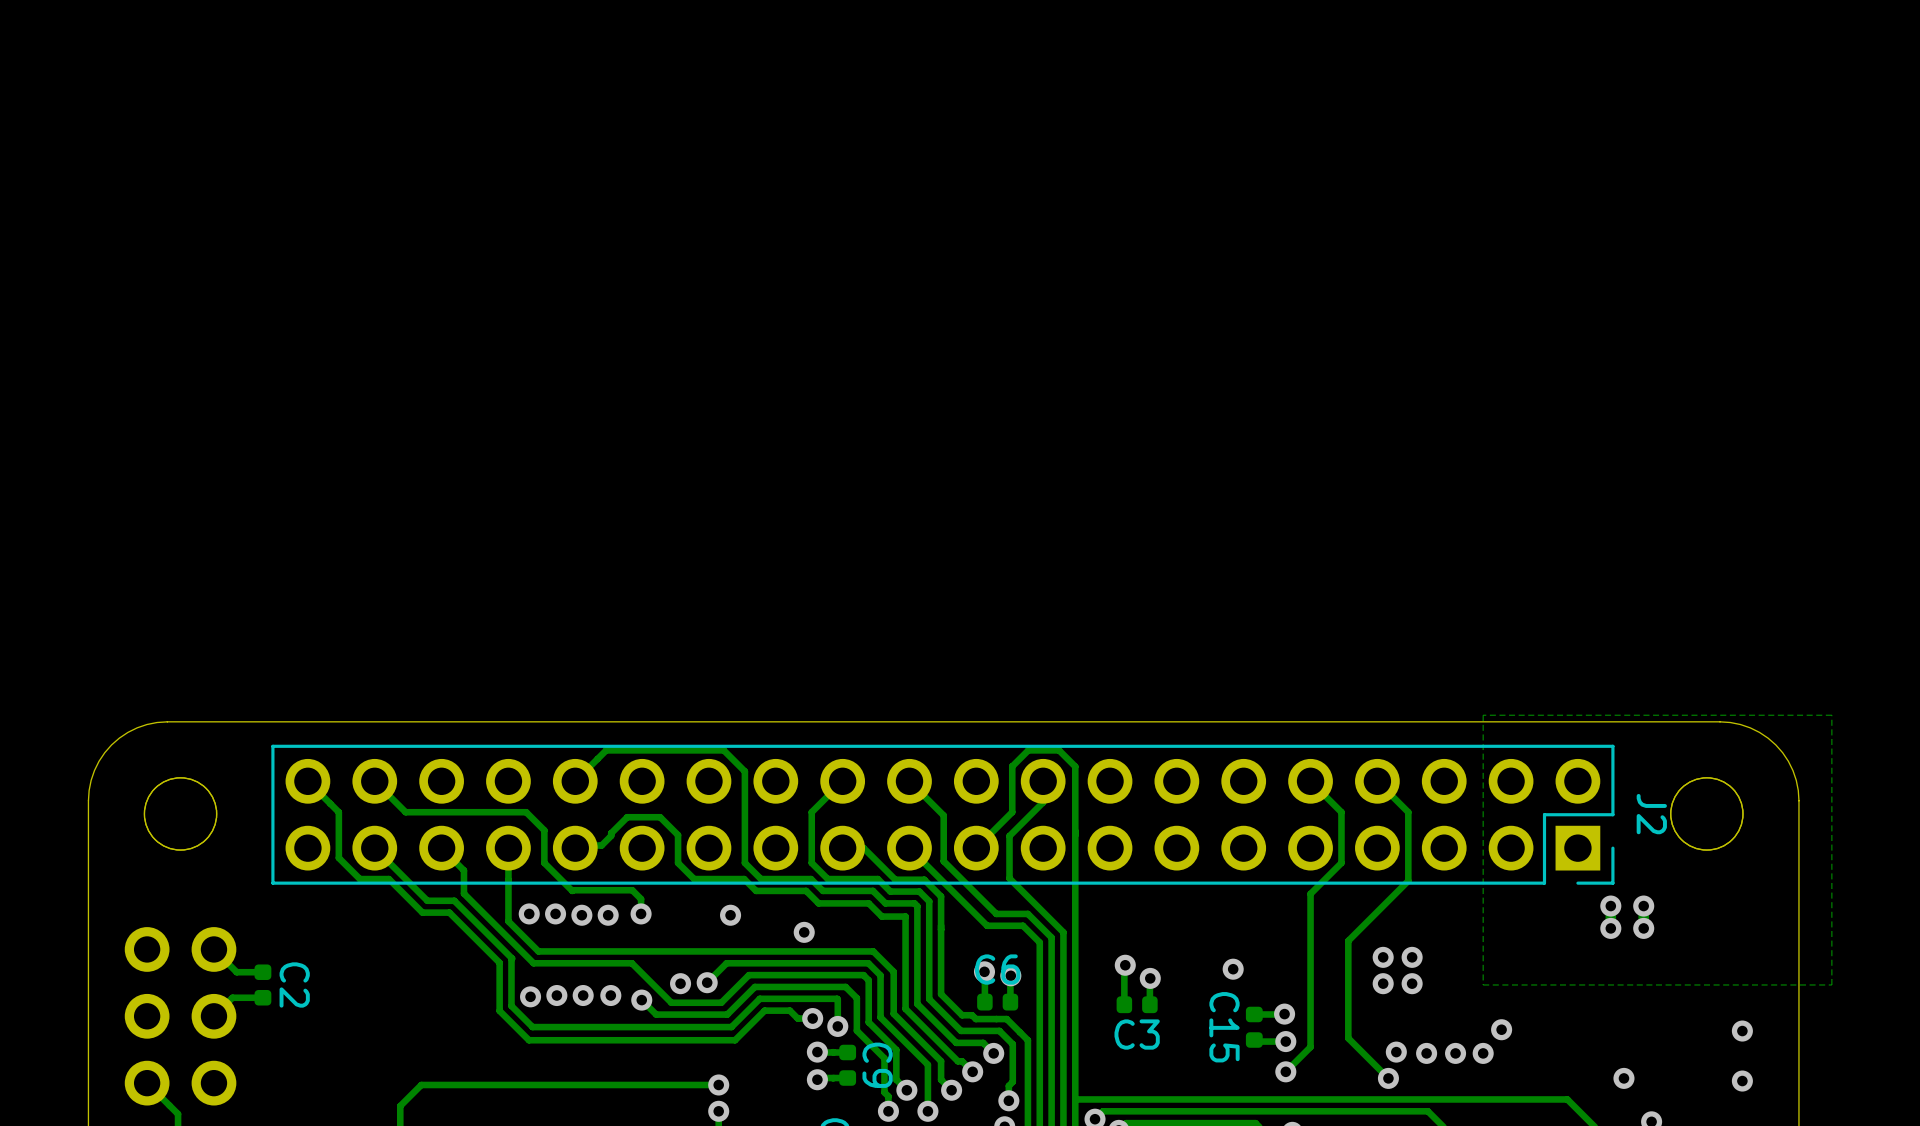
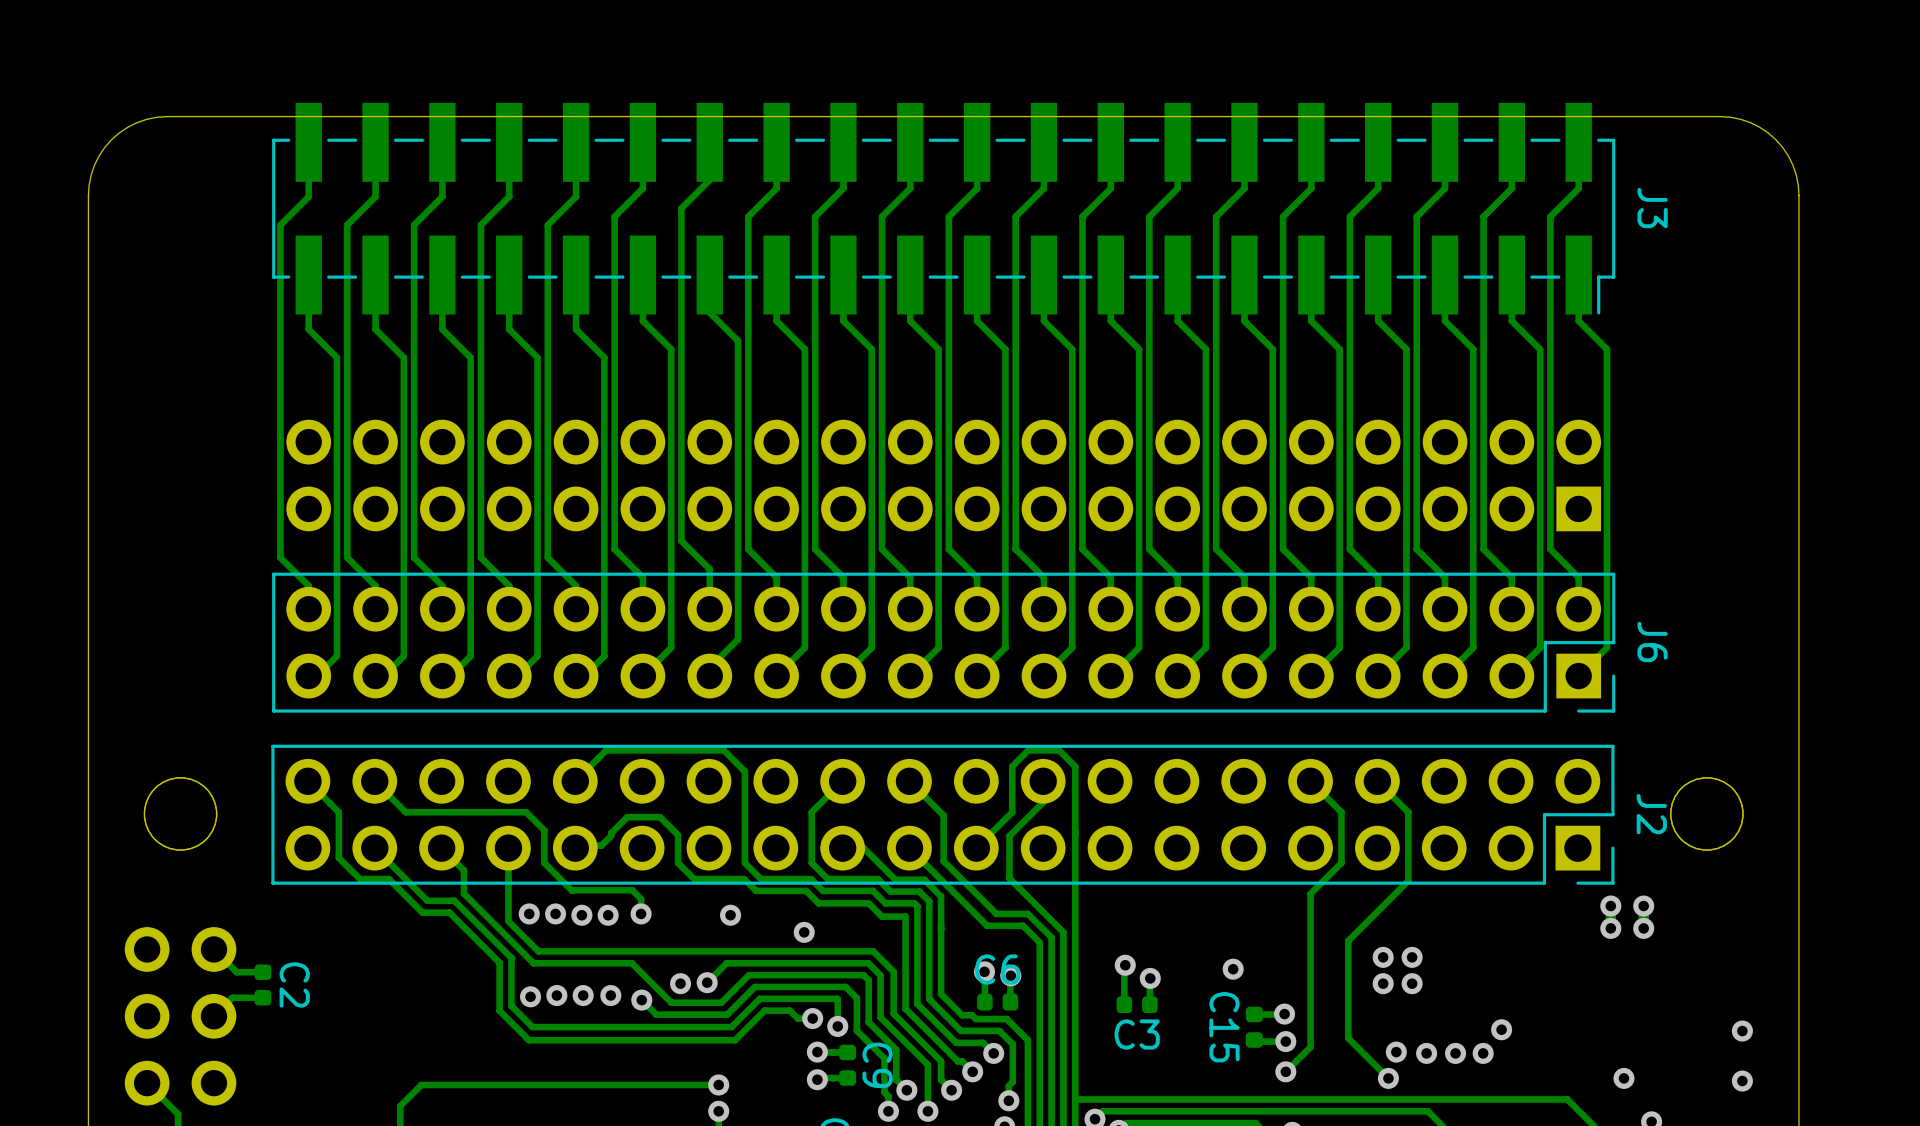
track: none -> (709, 134) (709, 180) (681, 208) (681, 540) (709, 569) (709, 600)
track: none -> (642, 142) (642, 188) (614, 216) (614, 549) (642, 577) (642, 609)
track: none -> (776, 142) (776, 188) (748, 216) (748, 549) (776, 577) (776, 609)
track: none -> (843, 142) (843, 188) (815, 216) (815, 549) (843, 577) (843, 609)
track: none -> (910, 142) (910, 188) (882, 216) (882, 549) (910, 577) (910, 609)
track: none -> (977, 142) (977, 188) (948, 216) (948, 549) (977, 577) (977, 609)
track: none -> (1043, 142) (1043, 188) (1015, 216) (1015, 549) (1043, 577) (1043, 609)
track: none -> (1110, 142) (1110, 188) (1082, 216) (1082, 549) (1110, 577) (1110, 609)
track: none -> (1177, 142) (1177, 188) (1149, 216) (1149, 549) (1177, 577) (1177, 609)
track: none -> (1244, 142) (1244, 188) (1216, 216) (1216, 549) (1244, 577) (1244, 609)
track: none -> (1311, 142) (1311, 188) (1283, 216) (1283, 549) (1311, 577) (1311, 609)
track: none -> (1378, 142) (1378, 188) (1349, 216) (1349, 549) (1378, 577) (1378, 609)
track: none -> (1445, 142) (1445, 188) (1416, 216) (1416, 549) (1445, 577) (1445, 609)
track: none -> (1511, 142) (1511, 188) (1483, 216) (1483, 549) (1511, 577) (1511, 609)
track: none -> (1578, 142) (1578, 188) (1550, 216) (1550, 549) (1578, 577) (1578, 609)
track: none -> (308, 150) (308, 196) (280, 225) (280, 557) (308, 585) (308, 617)
track: none -> (375, 150) (375, 196) (347, 225) (347, 557) (375, 585) (375, 617)
track: none -> (442, 150) (442, 196) (414, 225) (414, 557) (442, 585) (442, 617)
track: none -> (509, 150) (509, 196) (480, 225) (480, 557) (509, 585) (509, 617)
track: none -> (576, 150) (576, 196) (547, 225) (547, 557) (576, 585) (576, 617)
J3: none -> (943, 208)
track: none -> (709, 266) (709, 312) (738, 340) (738, 639) (709, 667)
track: none -> (642, 274) (642, 321) (671, 349) (671, 647) (642, 676)
track: none -> (776, 274) (776, 321) (804, 349) (804, 647) (776, 676)
track: none -> (843, 274) (843, 321) (871, 349) (871, 647) (843, 676)
track: none -> (910, 274) (910, 321) (938, 349) (938, 647) (910, 676)
track: none -> (977, 274) (977, 321) (1005, 349) (1005, 647) (977, 676)
track: none -> (1043, 274) (1043, 321) (1072, 349) (1072, 647) (1043, 676)
track: none -> (1110, 274) (1110, 321) (1139, 349) (1139, 647) (1110, 676)
track: none -> (1177, 274) (1177, 321) (1205, 349) (1205, 647) (1177, 676)
track: none -> (1244, 274) (1244, 321) (1272, 349) (1272, 647) (1244, 676)
track: none -> (1311, 274) (1311, 321) (1339, 349) (1339, 647) (1311, 676)
track: none -> (1378, 274) (1378, 321) (1406, 349) (1406, 647) (1378, 676)
track: none -> (1445, 274) (1445, 321) (1473, 349) (1473, 647) (1445, 676)
track: none -> (1511, 274) (1511, 321) (1540, 349) (1540, 647) (1511, 676)
track: none -> (1578, 274) (1578, 321) (1606, 349) (1606, 647) (1578, 676)
track: none -> (308, 283) (308, 329) (337, 357) (337, 656) (308, 684)
track: none -> (375, 283) (375, 329) (403, 357) (403, 656) (375, 684)
track: none -> (442, 283) (442, 329) (470, 357) (470, 656) (442, 684)
track: none -> (509, 283) (509, 329) (537, 357) (537, 656) (509, 684)
track: none -> (576, 283) (576, 329) (604, 357) (604, 656) (576, 684)
part: none -> (943, 475)
J6: none -> (943, 642)
zone outline: (1831, 715) (1483, 715) (1483, 984) (1831, 984) (1831, 715) -> none
board edge: (1798, 800) (1792, 770) (1775, 744) (1750, 727) (1720, 721) (167, 721) (137, 727) (111, 744) (94, 770) (88, 800) -> (1798, 800) (1798, 185) (1788, 156) (1768, 132) (1740, 119) (1720, 116) (167, 116) (137, 122) (119, 132) (104, 147) (94, 165) (89, 185) (88, 800)

